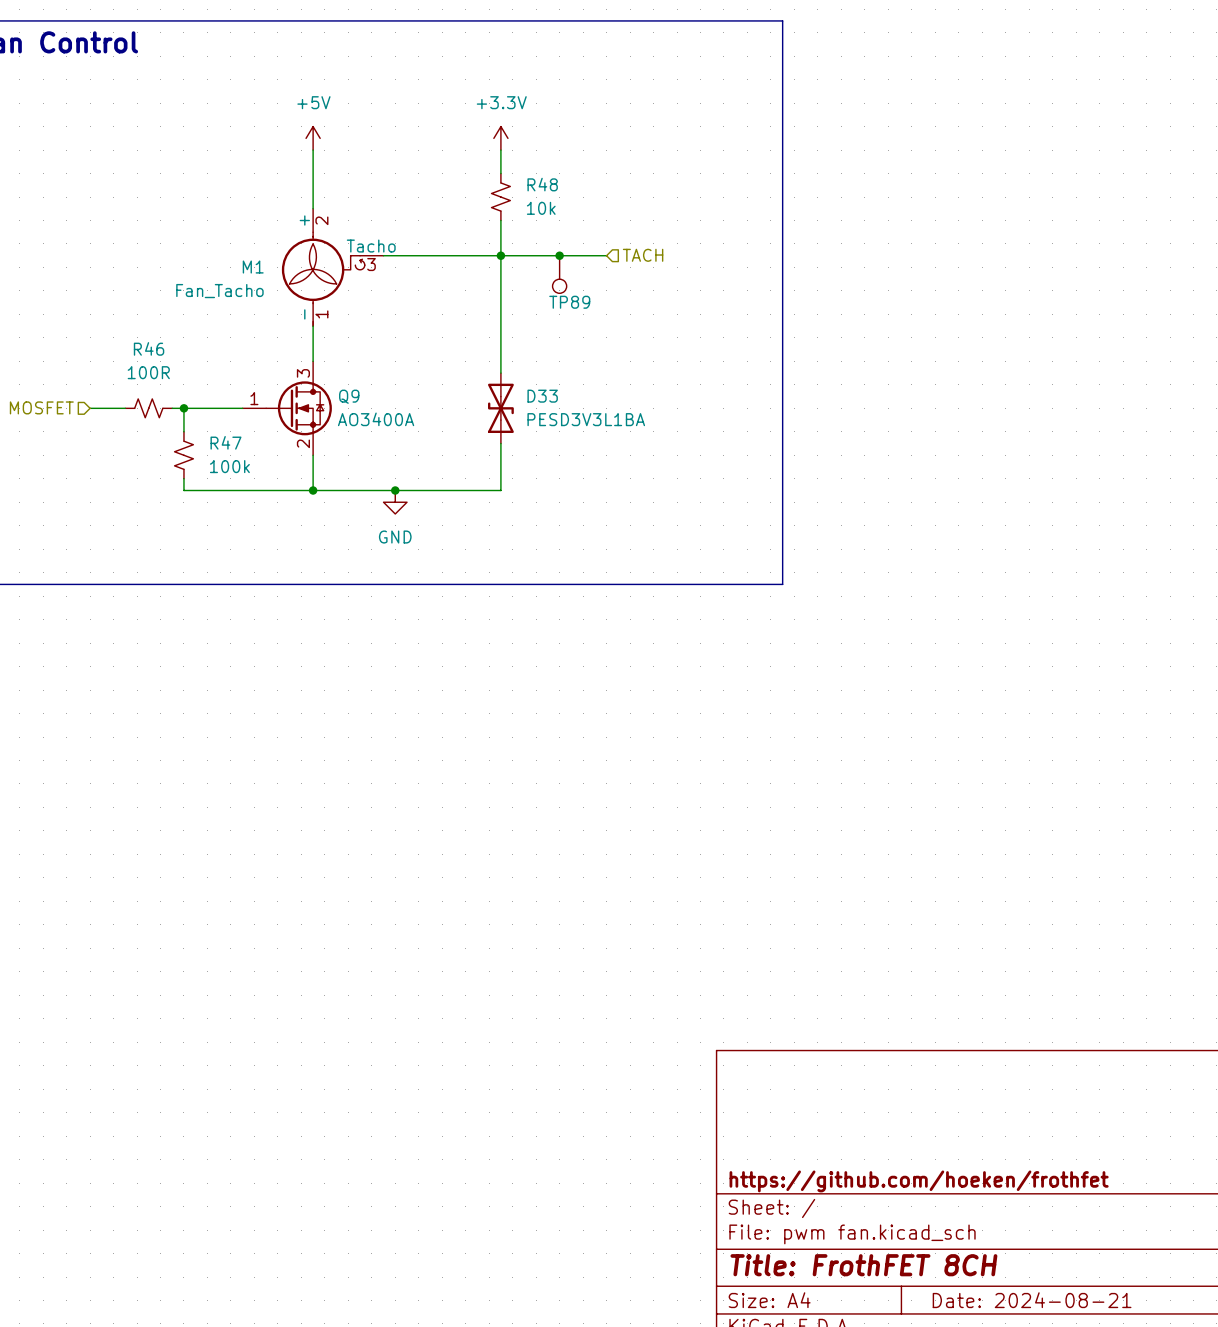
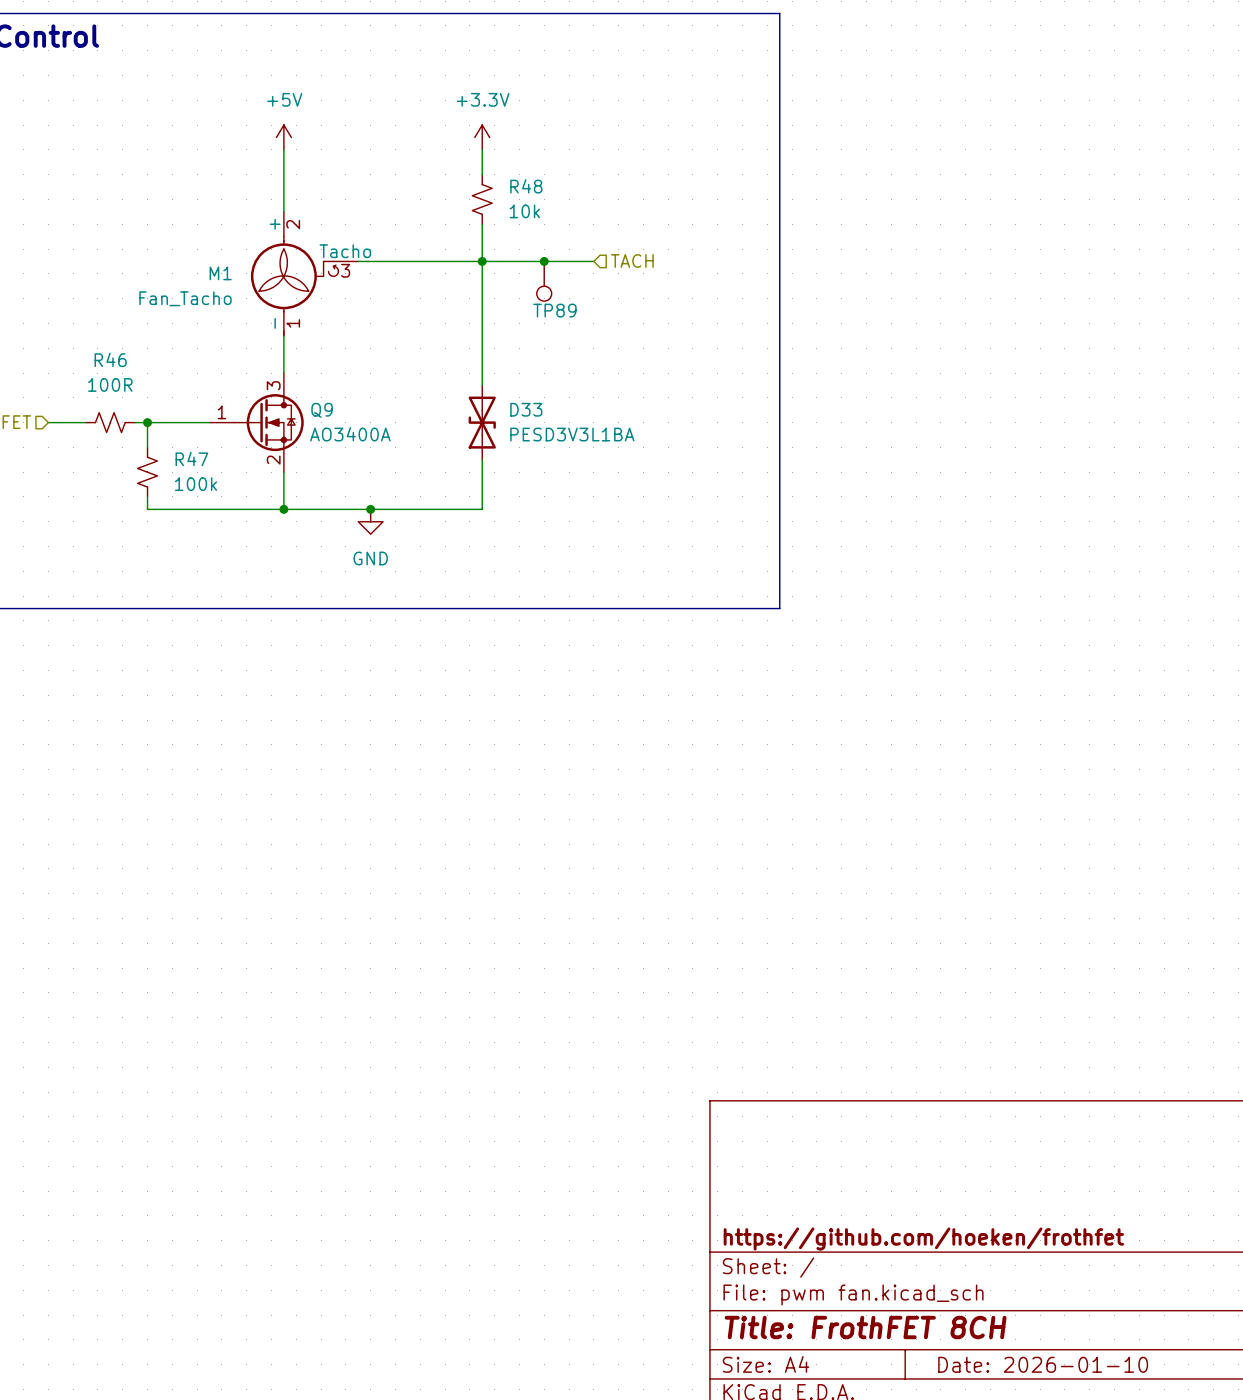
title block: Date: 2024-08-21 (1032, 1300) -> Date: 2026-01-10 (1043, 1364)

